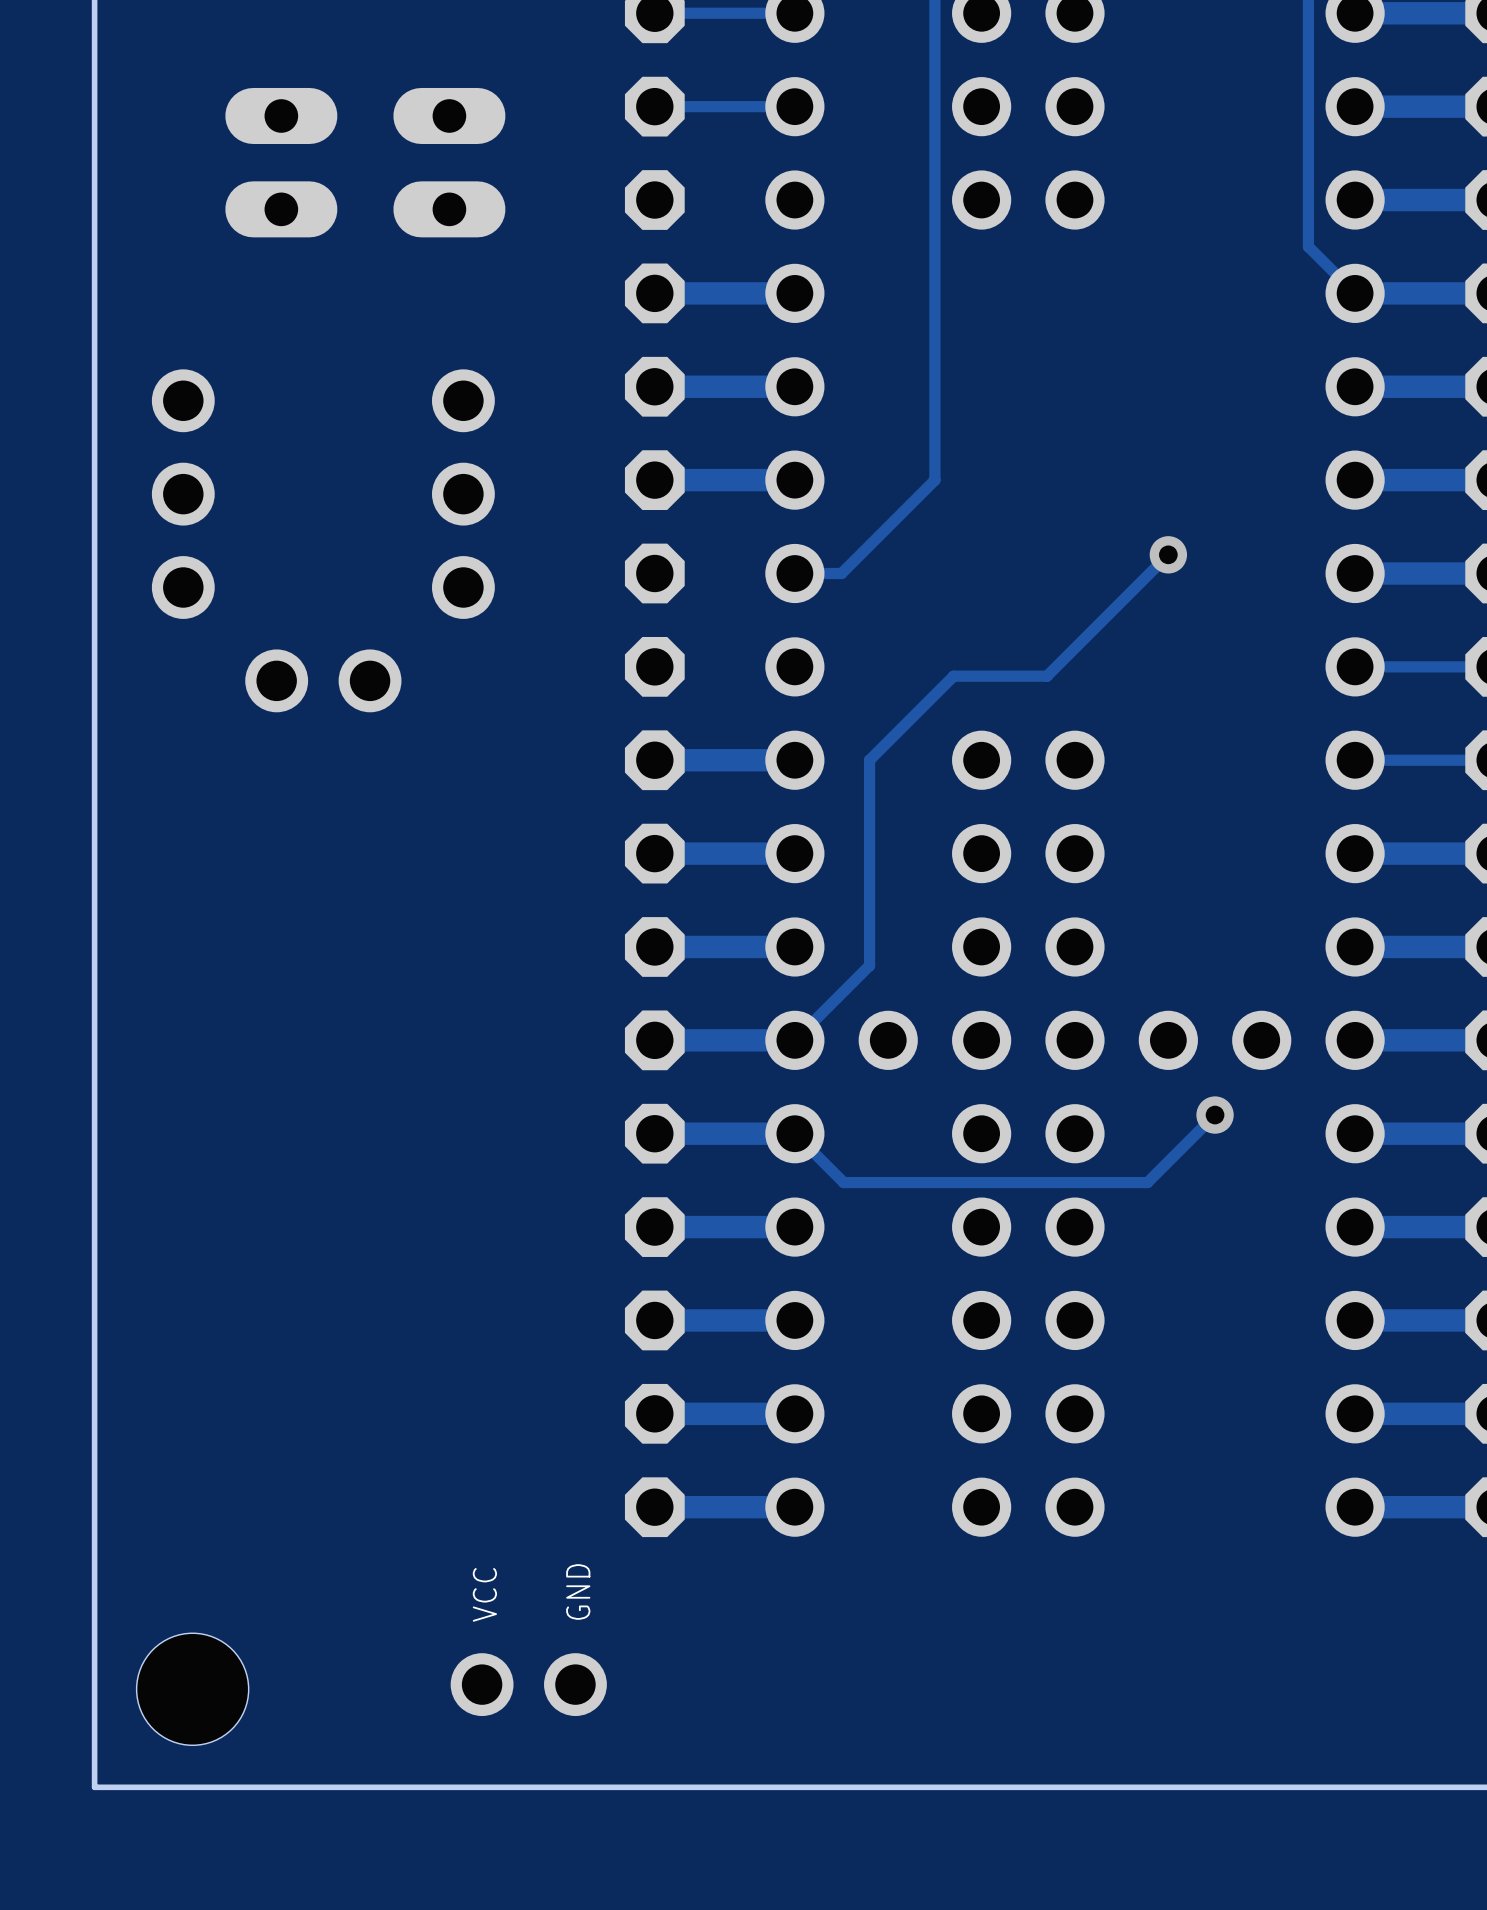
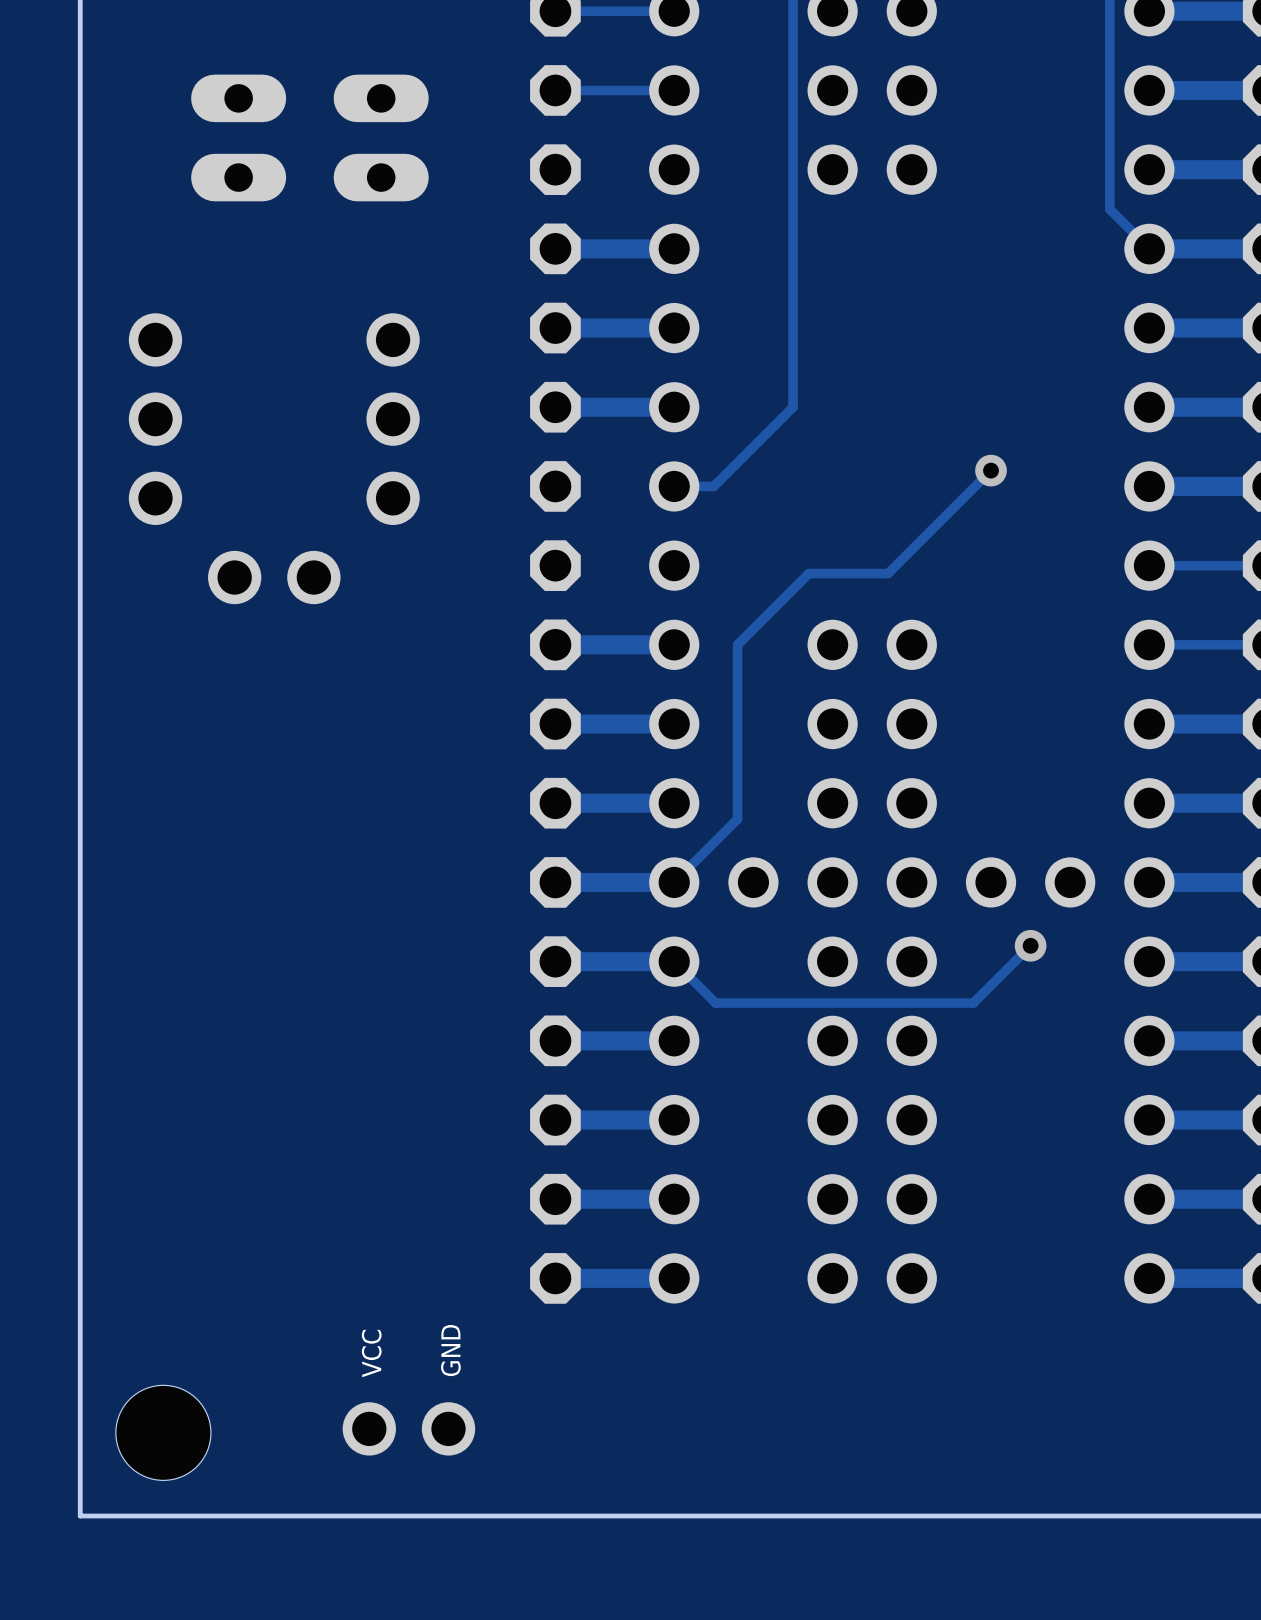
text position: GND (578, 1592) -> GND (450, 1350)
text position: VCC (484, 1594) -> VCC (371, 1353)
part position: (528, 1684) -> (408, 1428)

